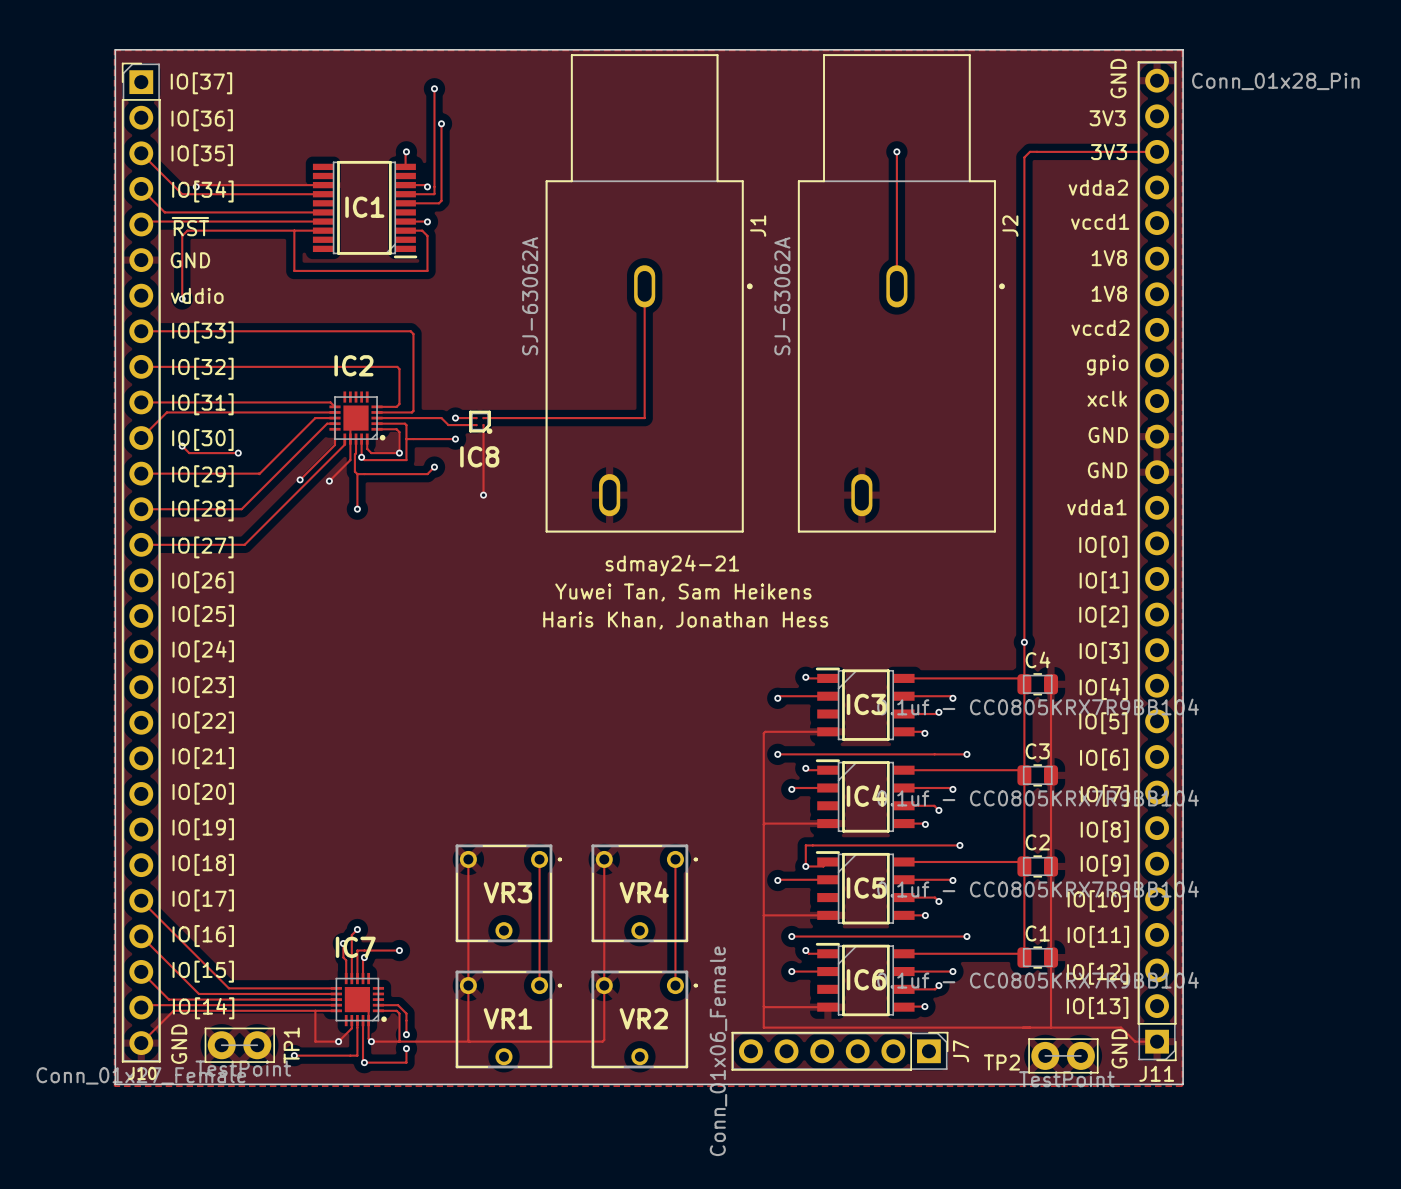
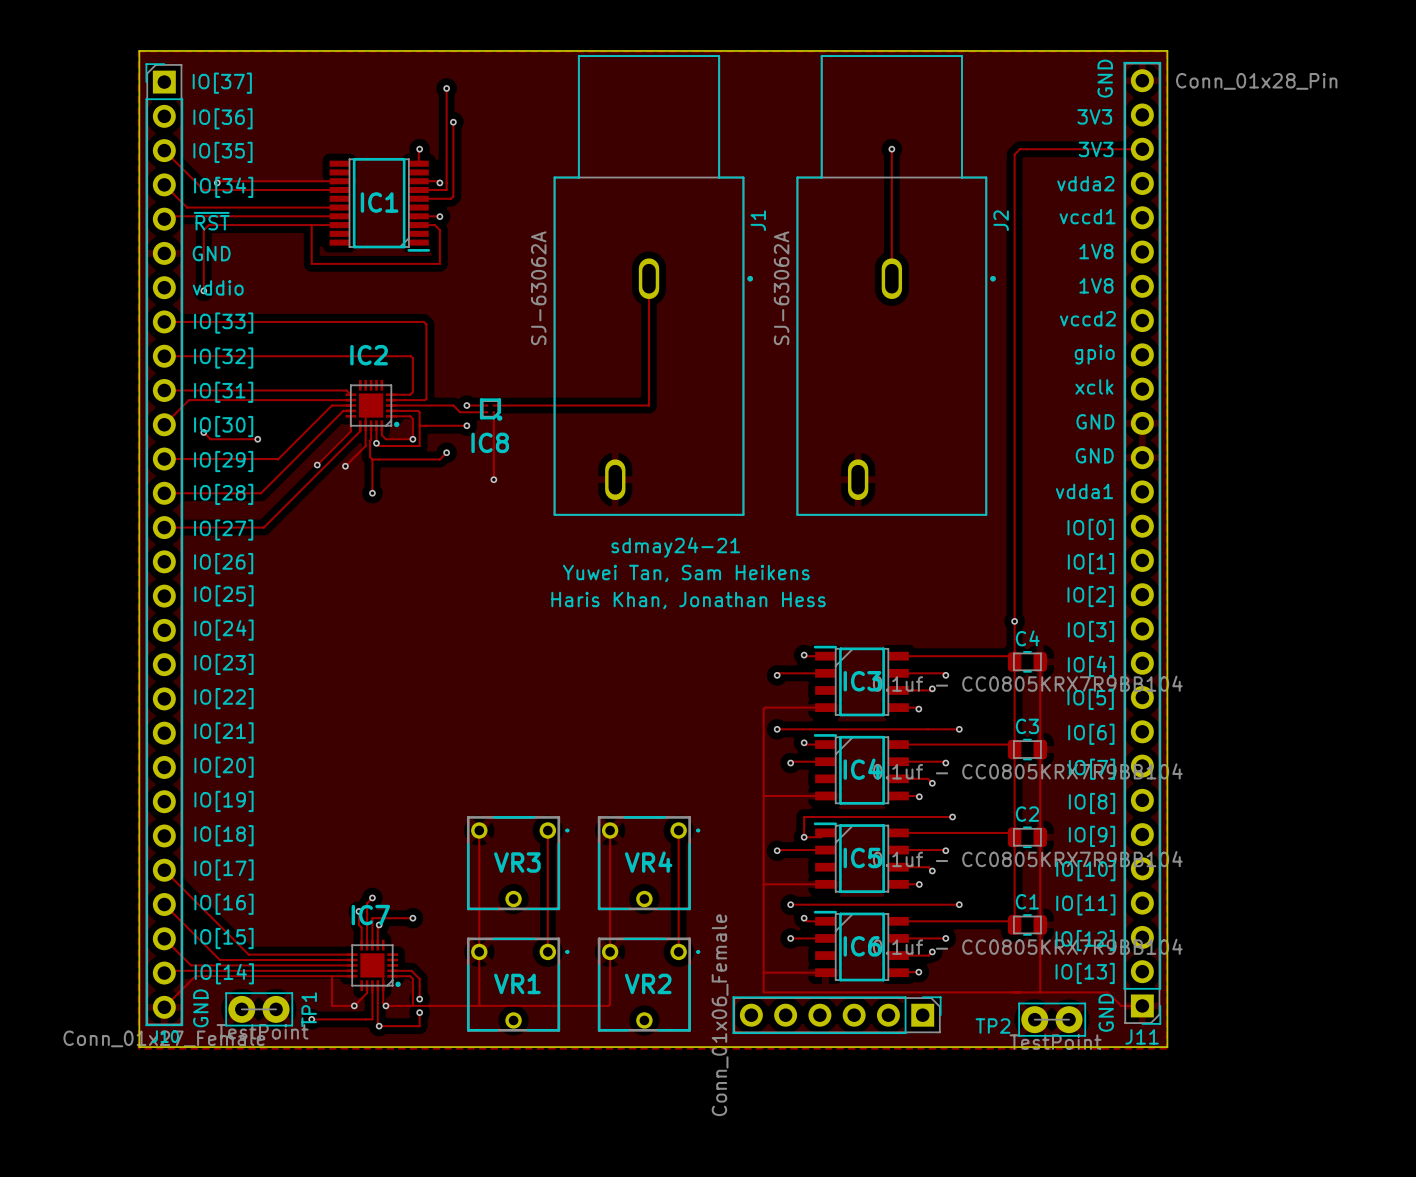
J7 name: J7 (961, 1051) -> none

